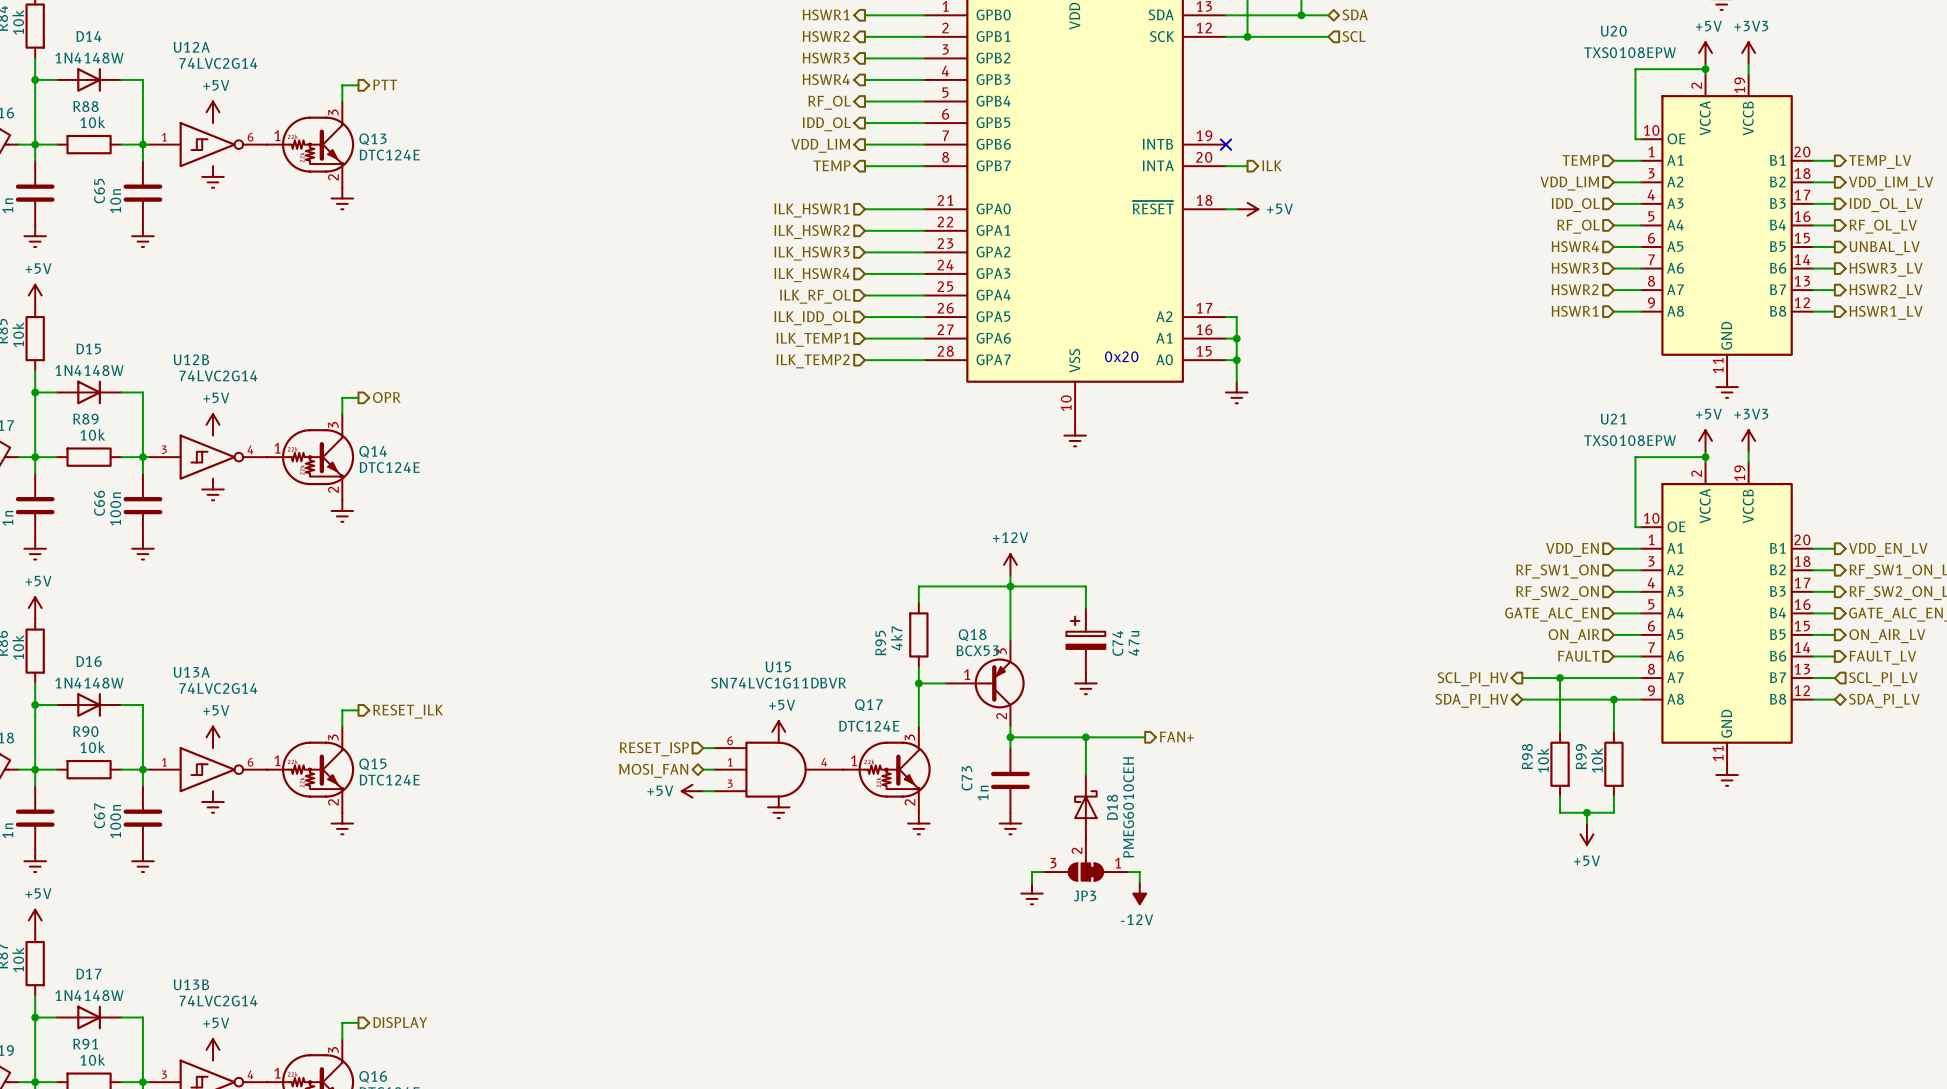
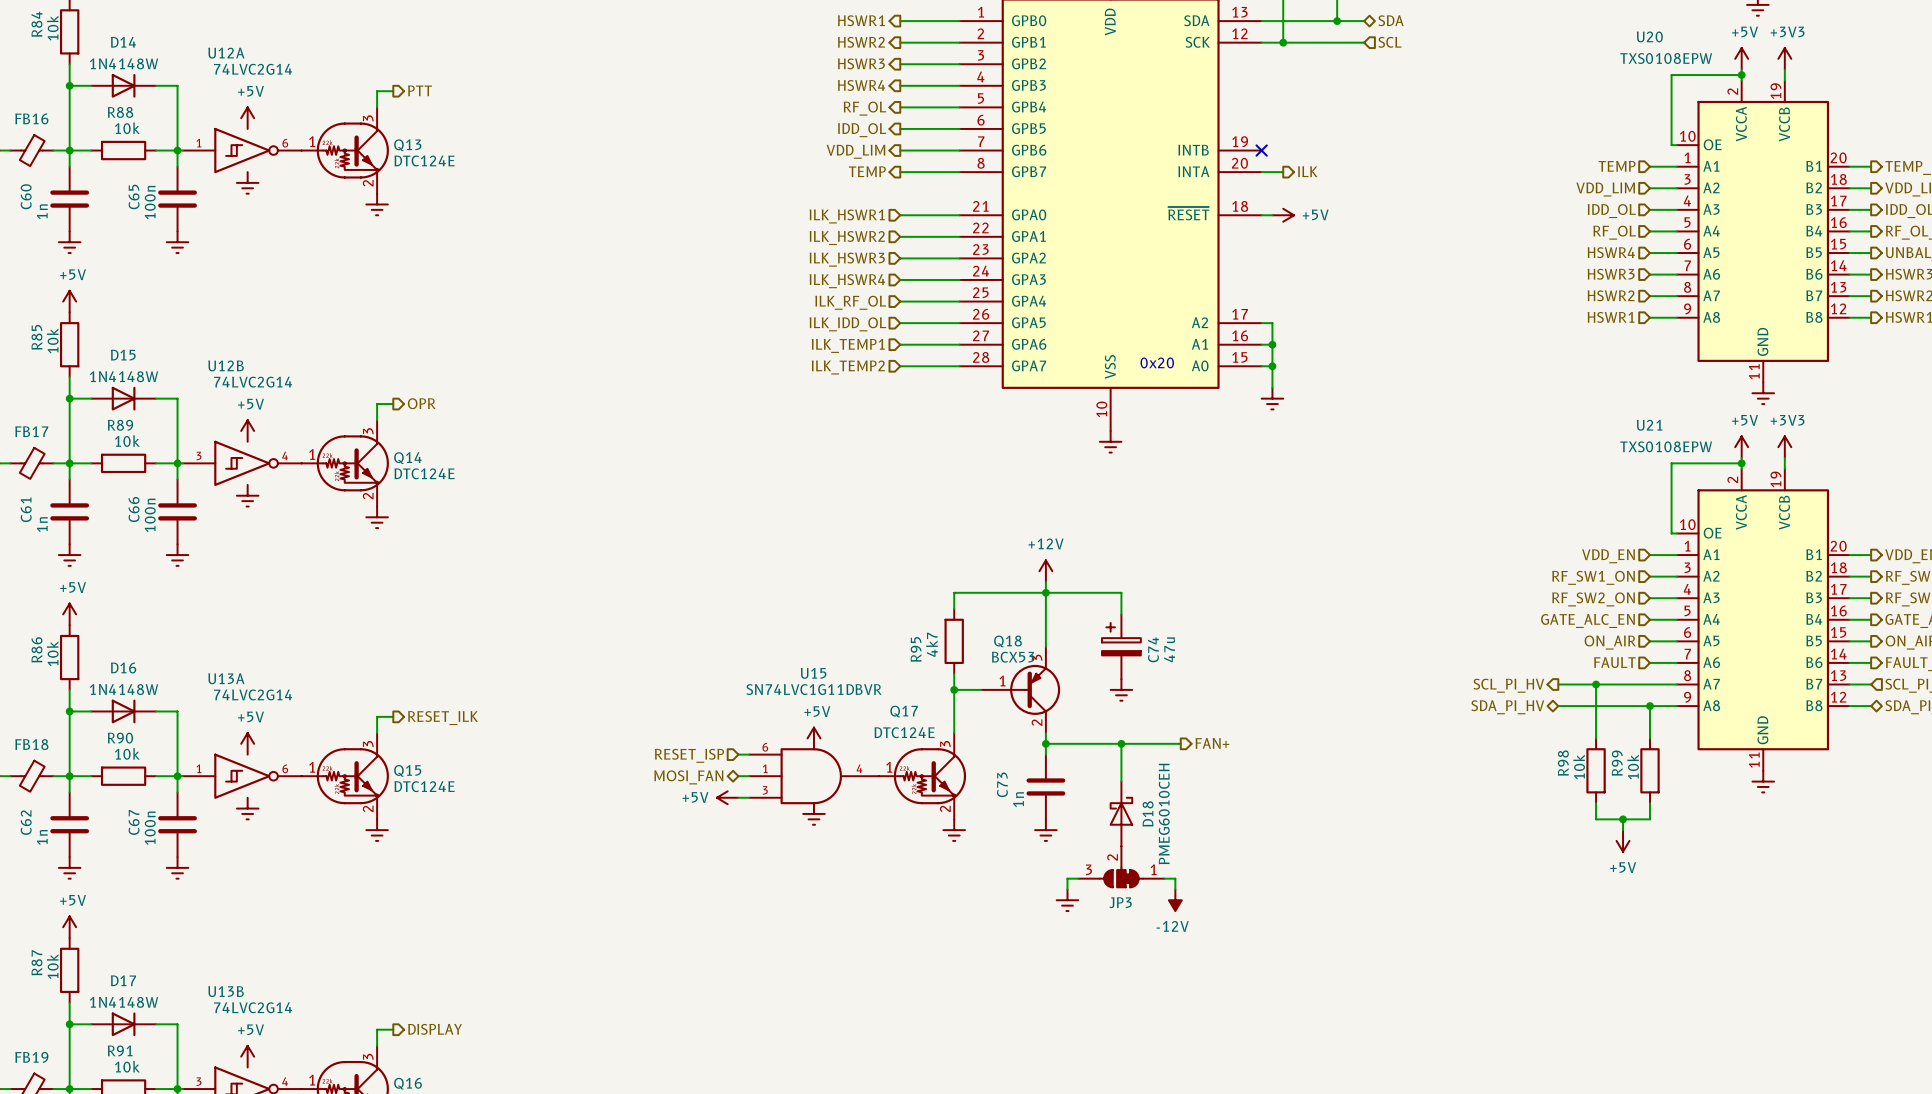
C65 value: 10n (115, 201) -> 100n (150, 202)

